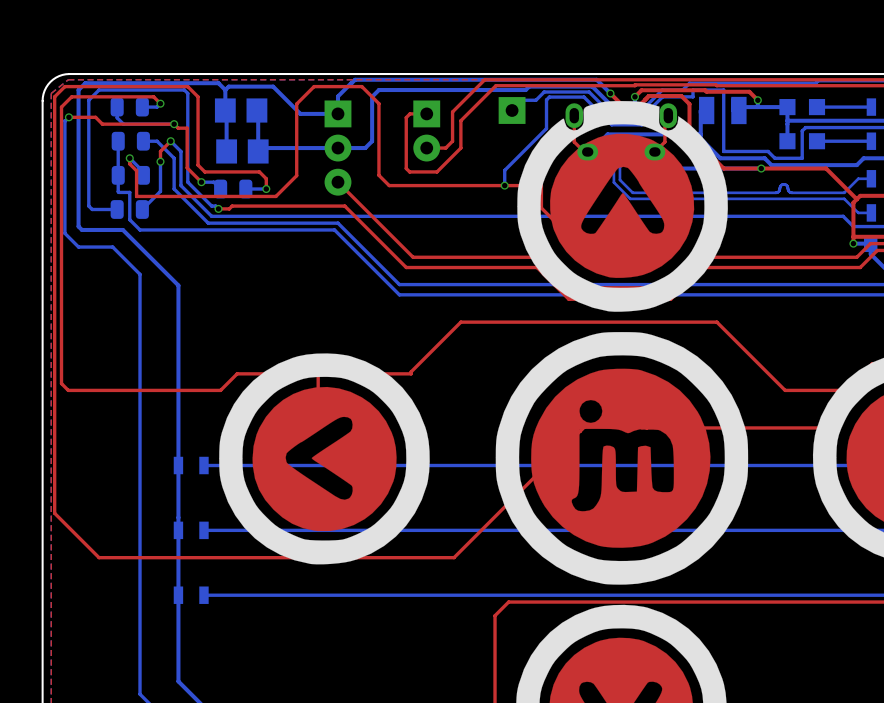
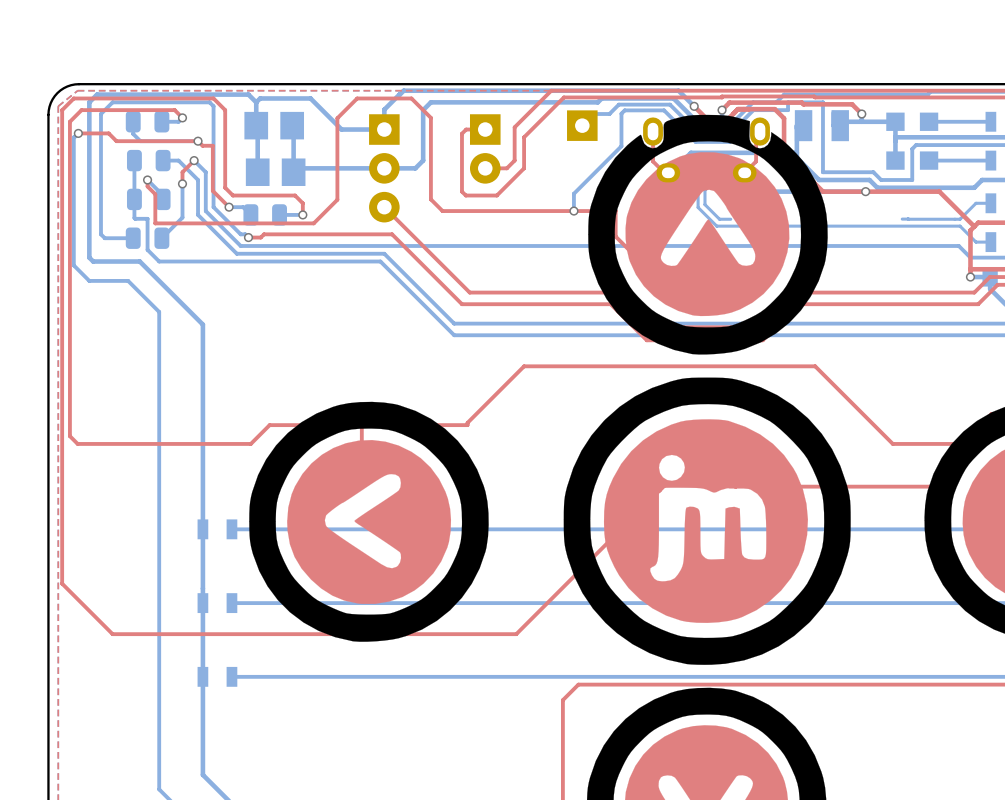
bottom track: (642, 192) (775, 192) (783, 184) (787, 185) (790, 192) (798, 192) -> (902, 219) (908, 219)

